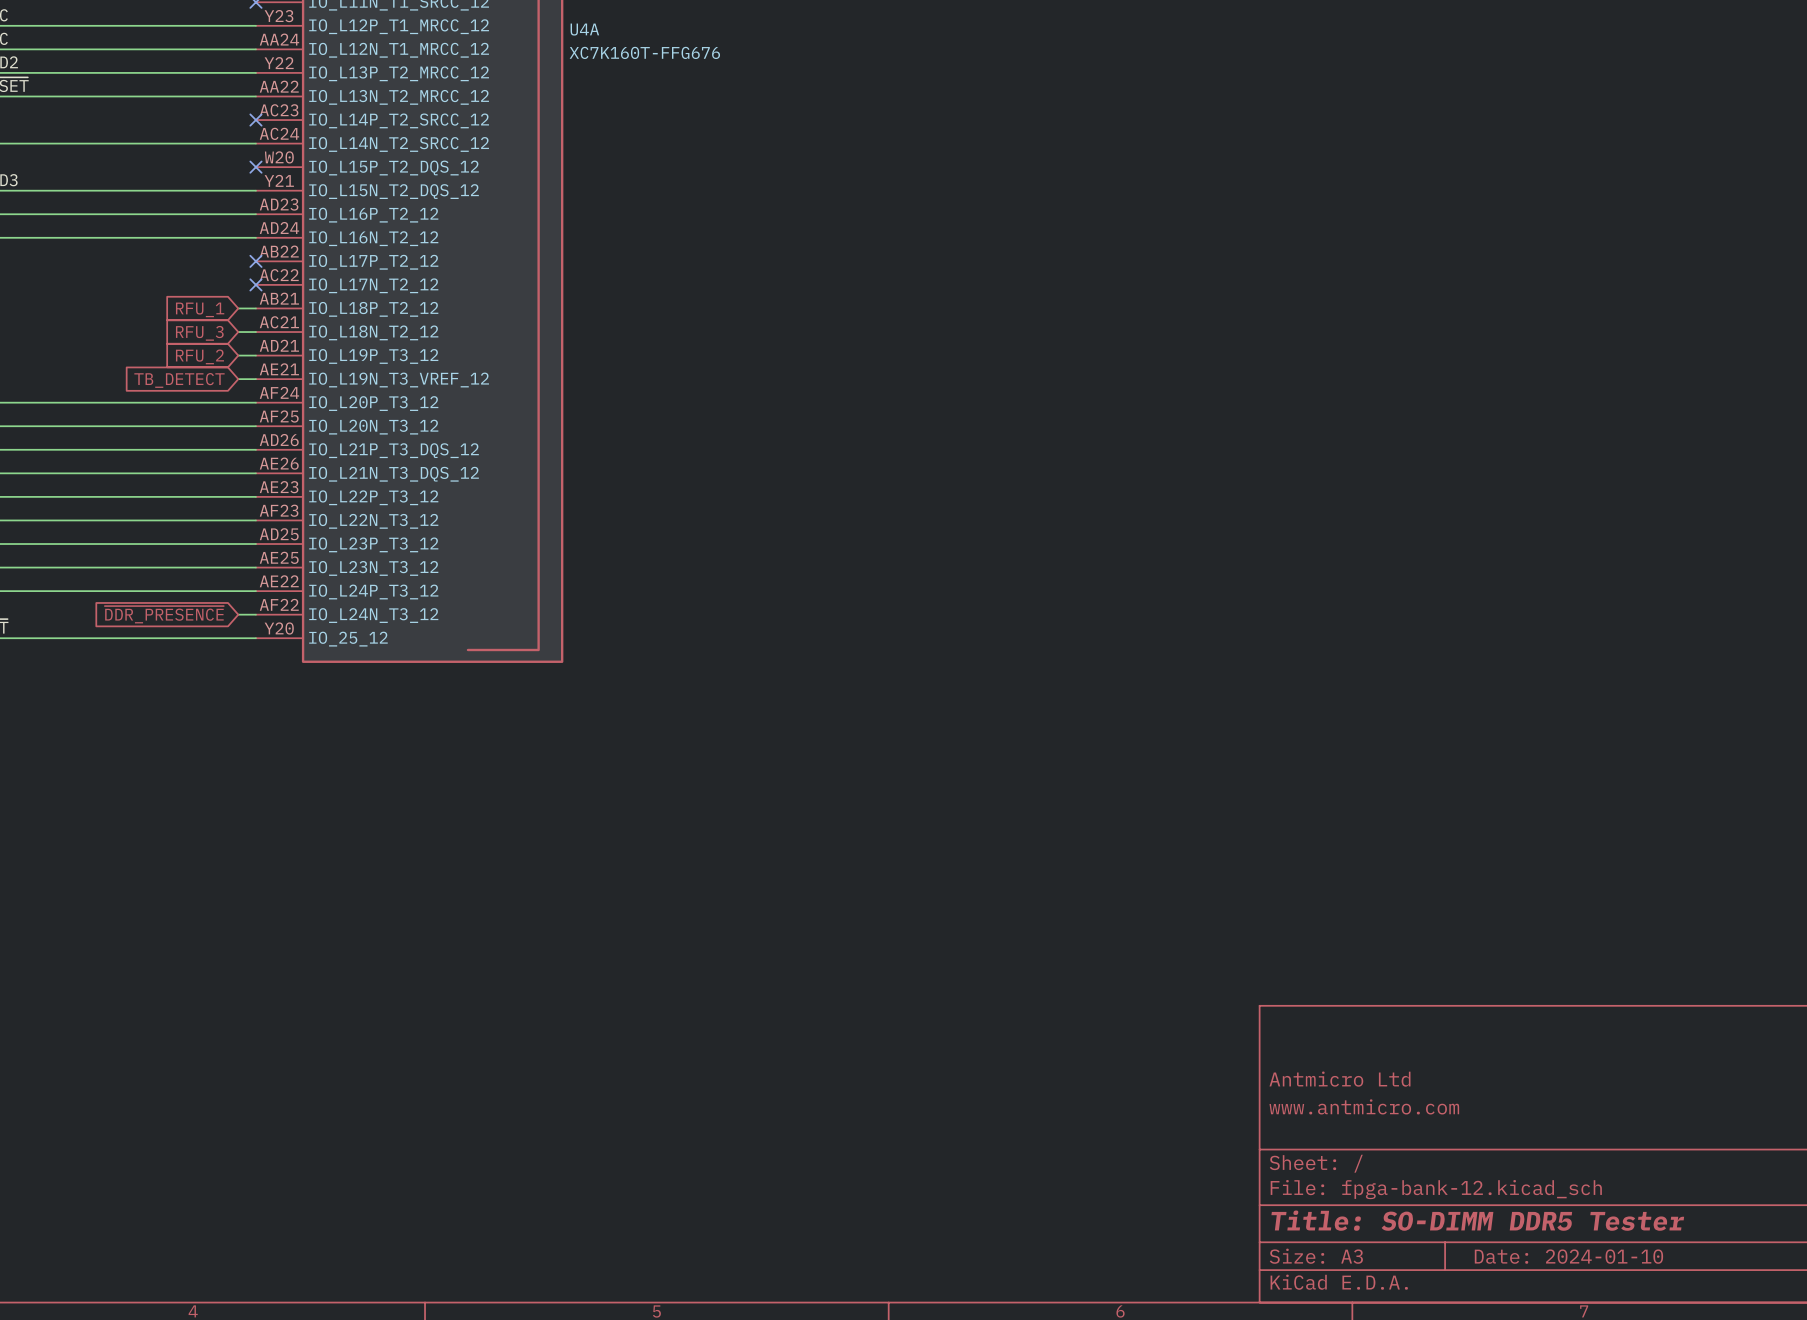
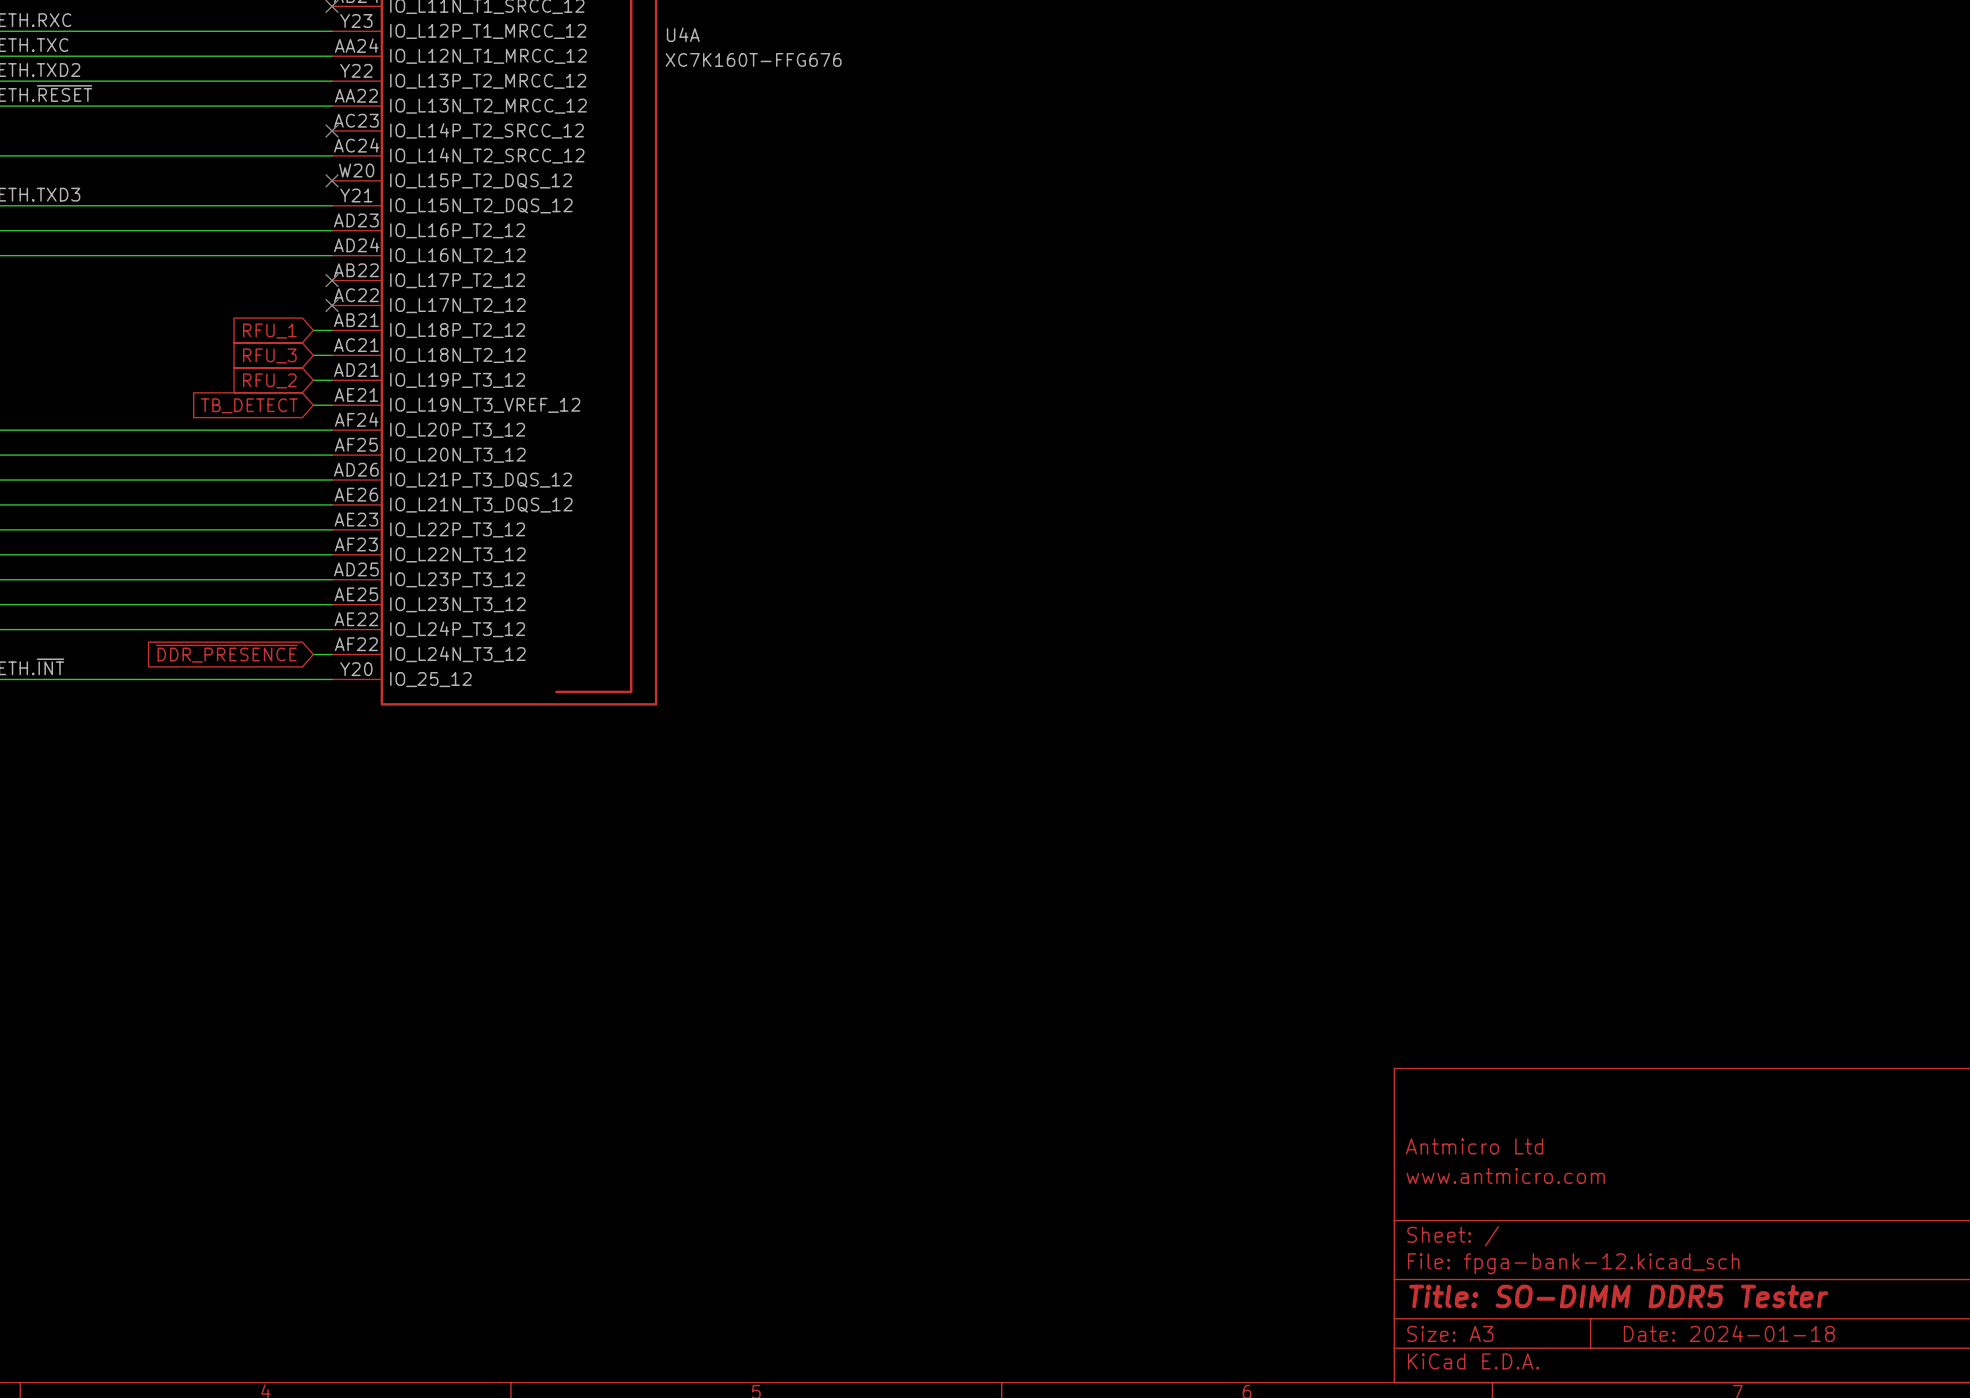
title block: Date: 2024-01-10 (1568, 1256) -> Date: 2024-01-18 (1729, 1333)

